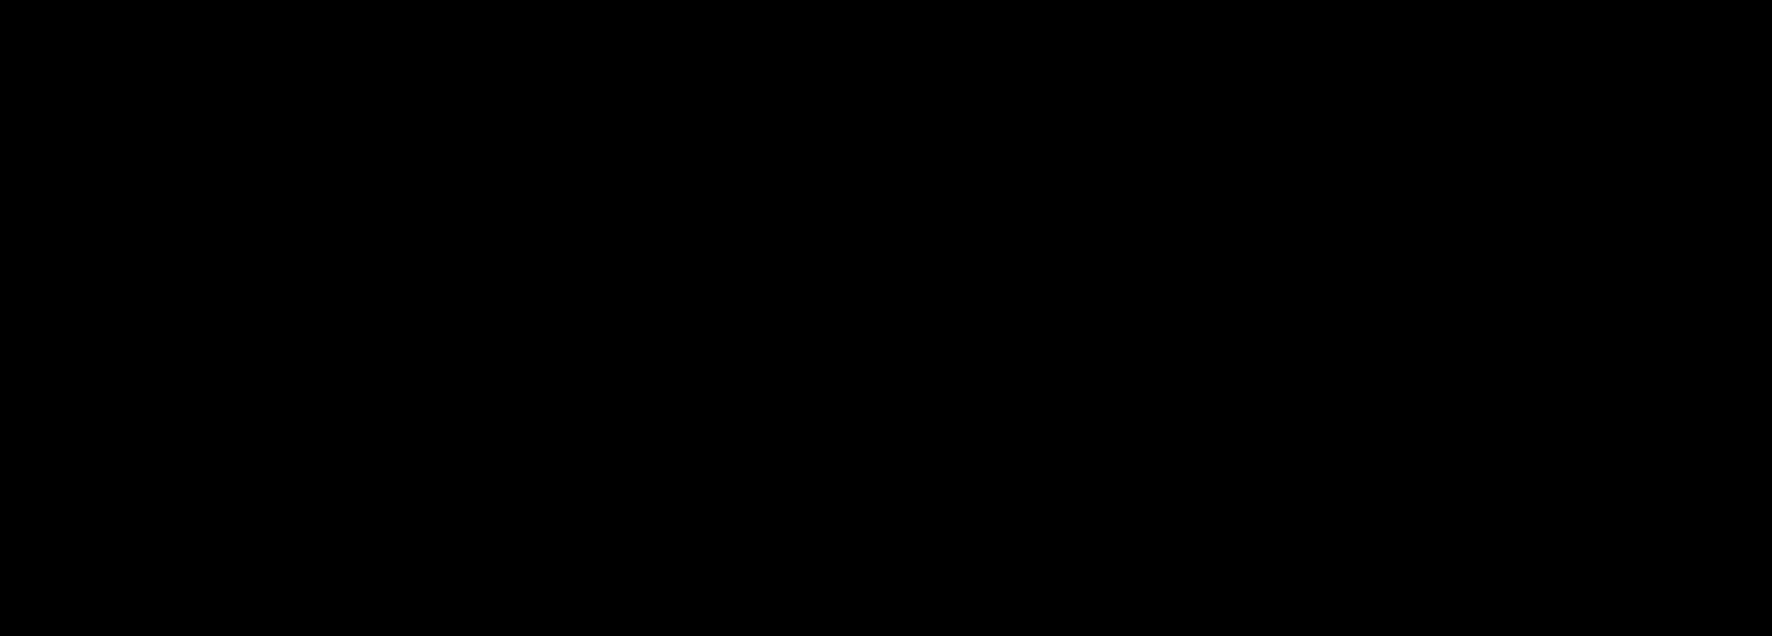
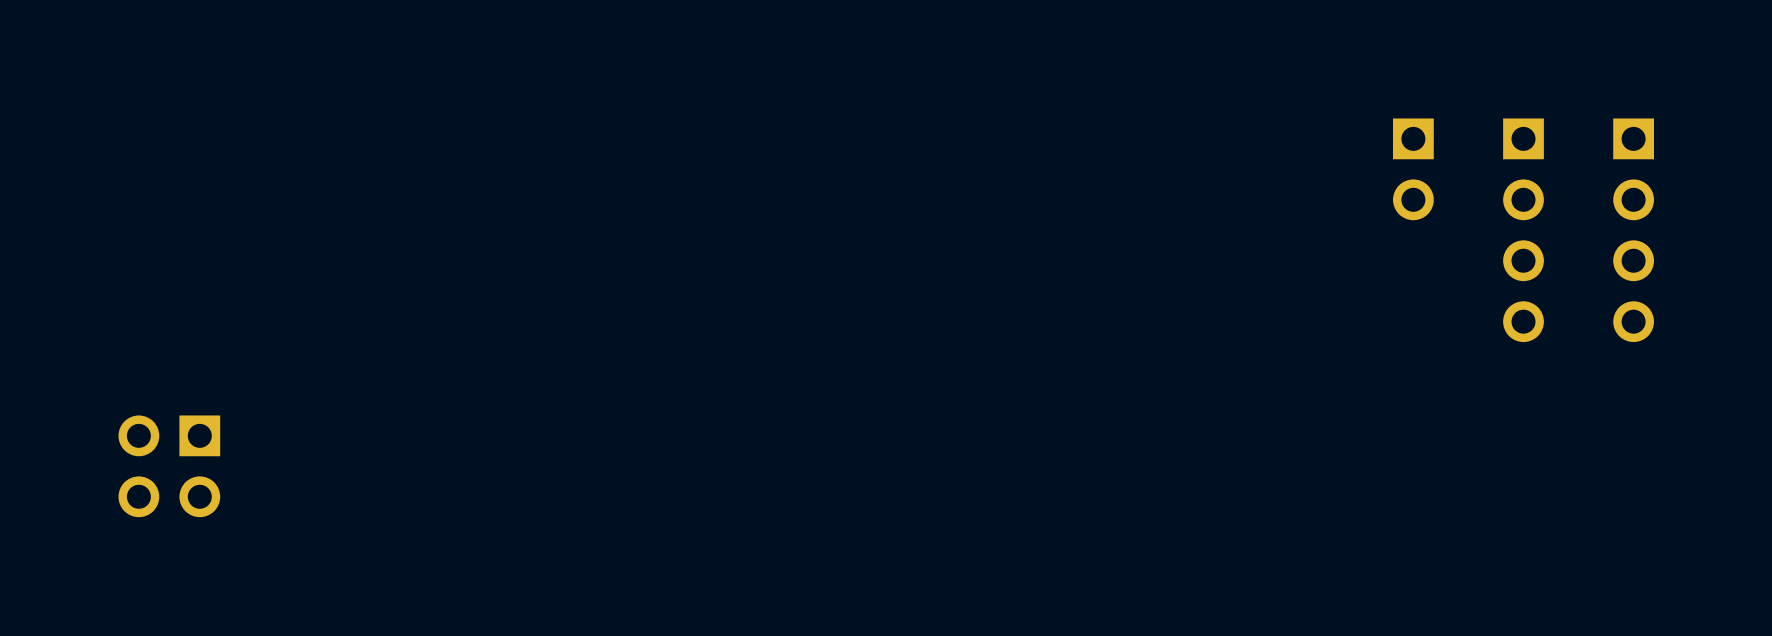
part: none -> (1413, 169)
part: none -> (1523, 230)
part: none -> (1633, 230)
part: none -> (169, 466)

